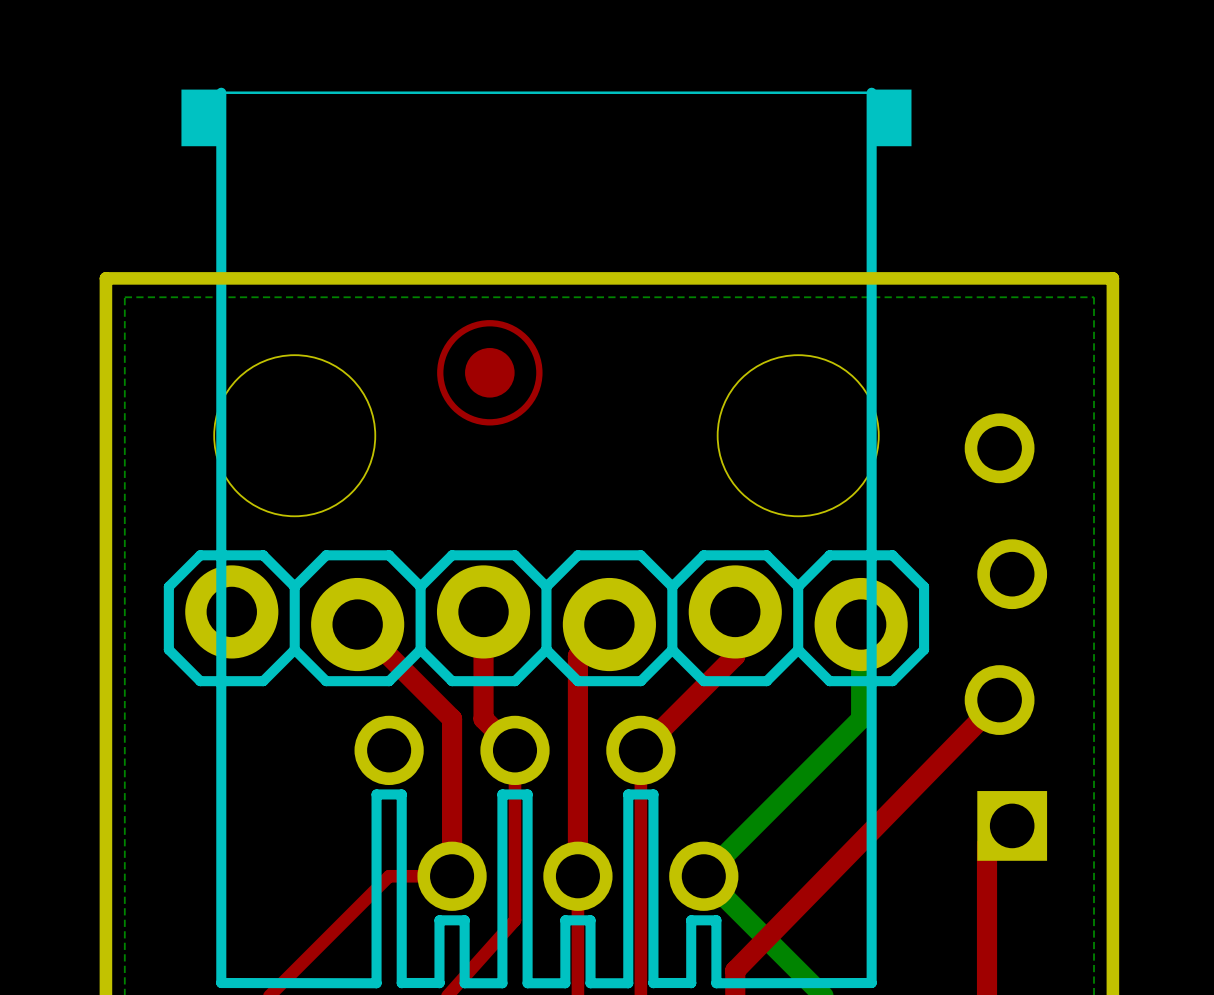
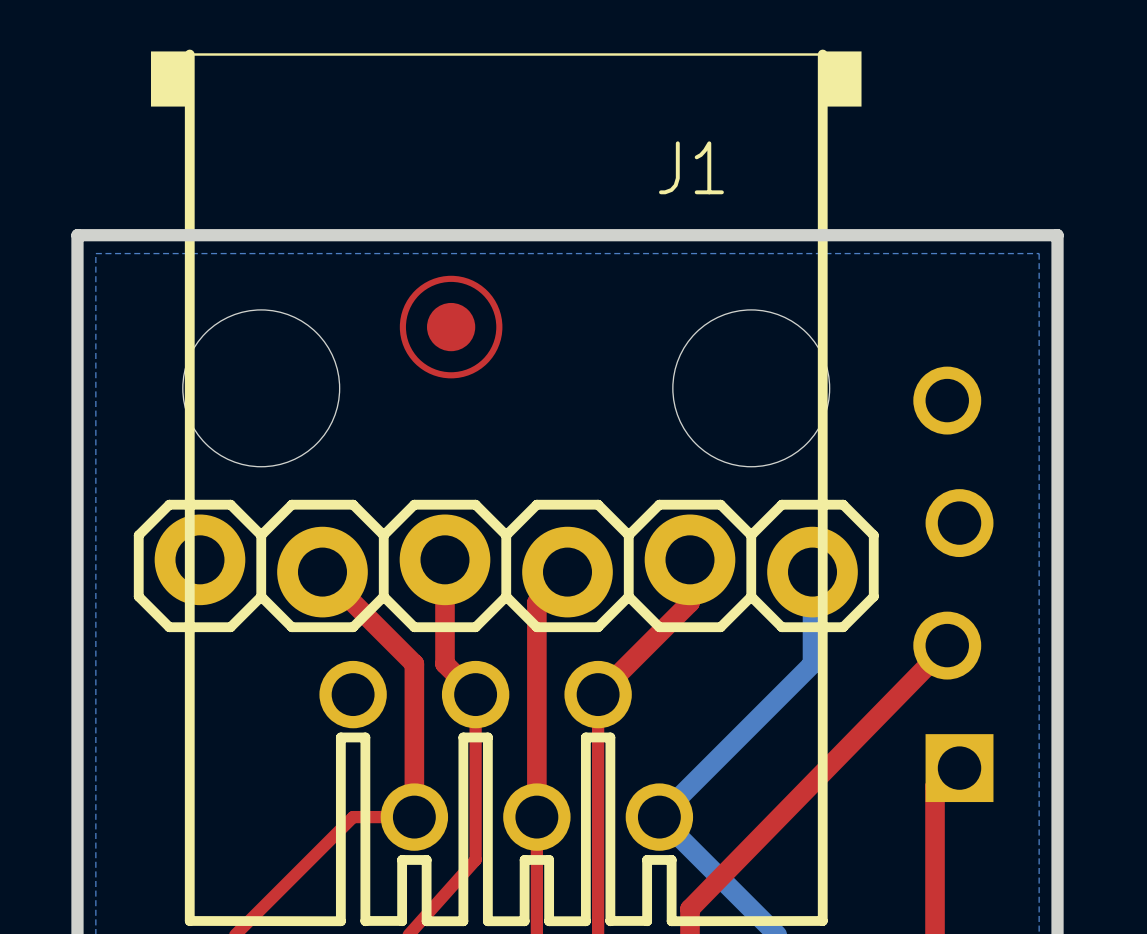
J1 name: none -> J1 (691, 167)

